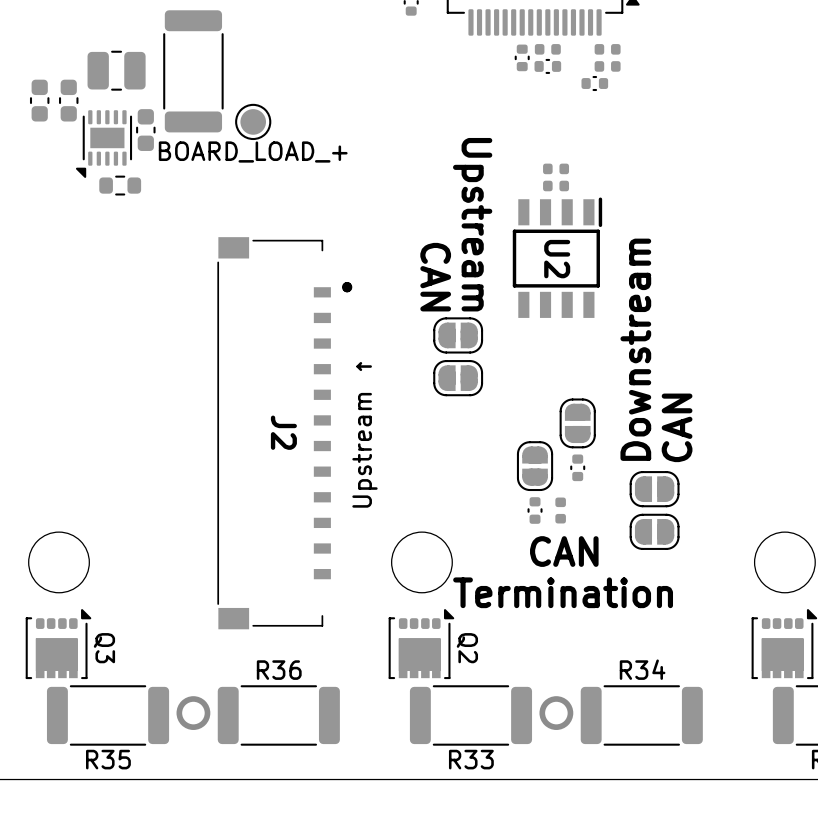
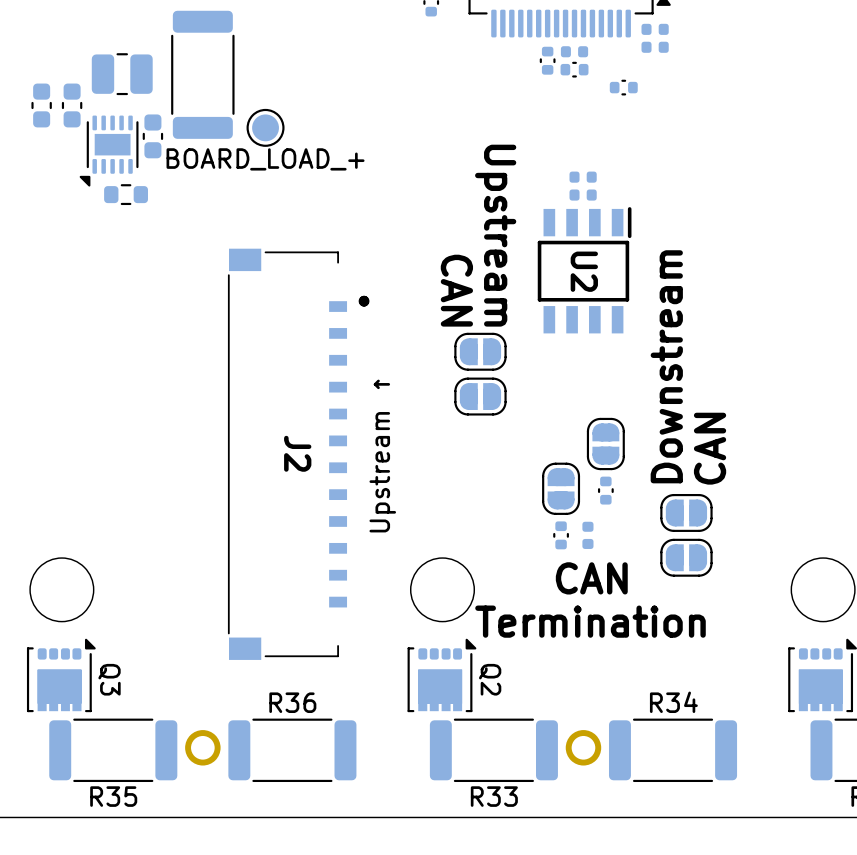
part: none -> (655, 29)
part: none -> (655, 47)
part: (607, 49) -> none
part: (607, 66) -> none

